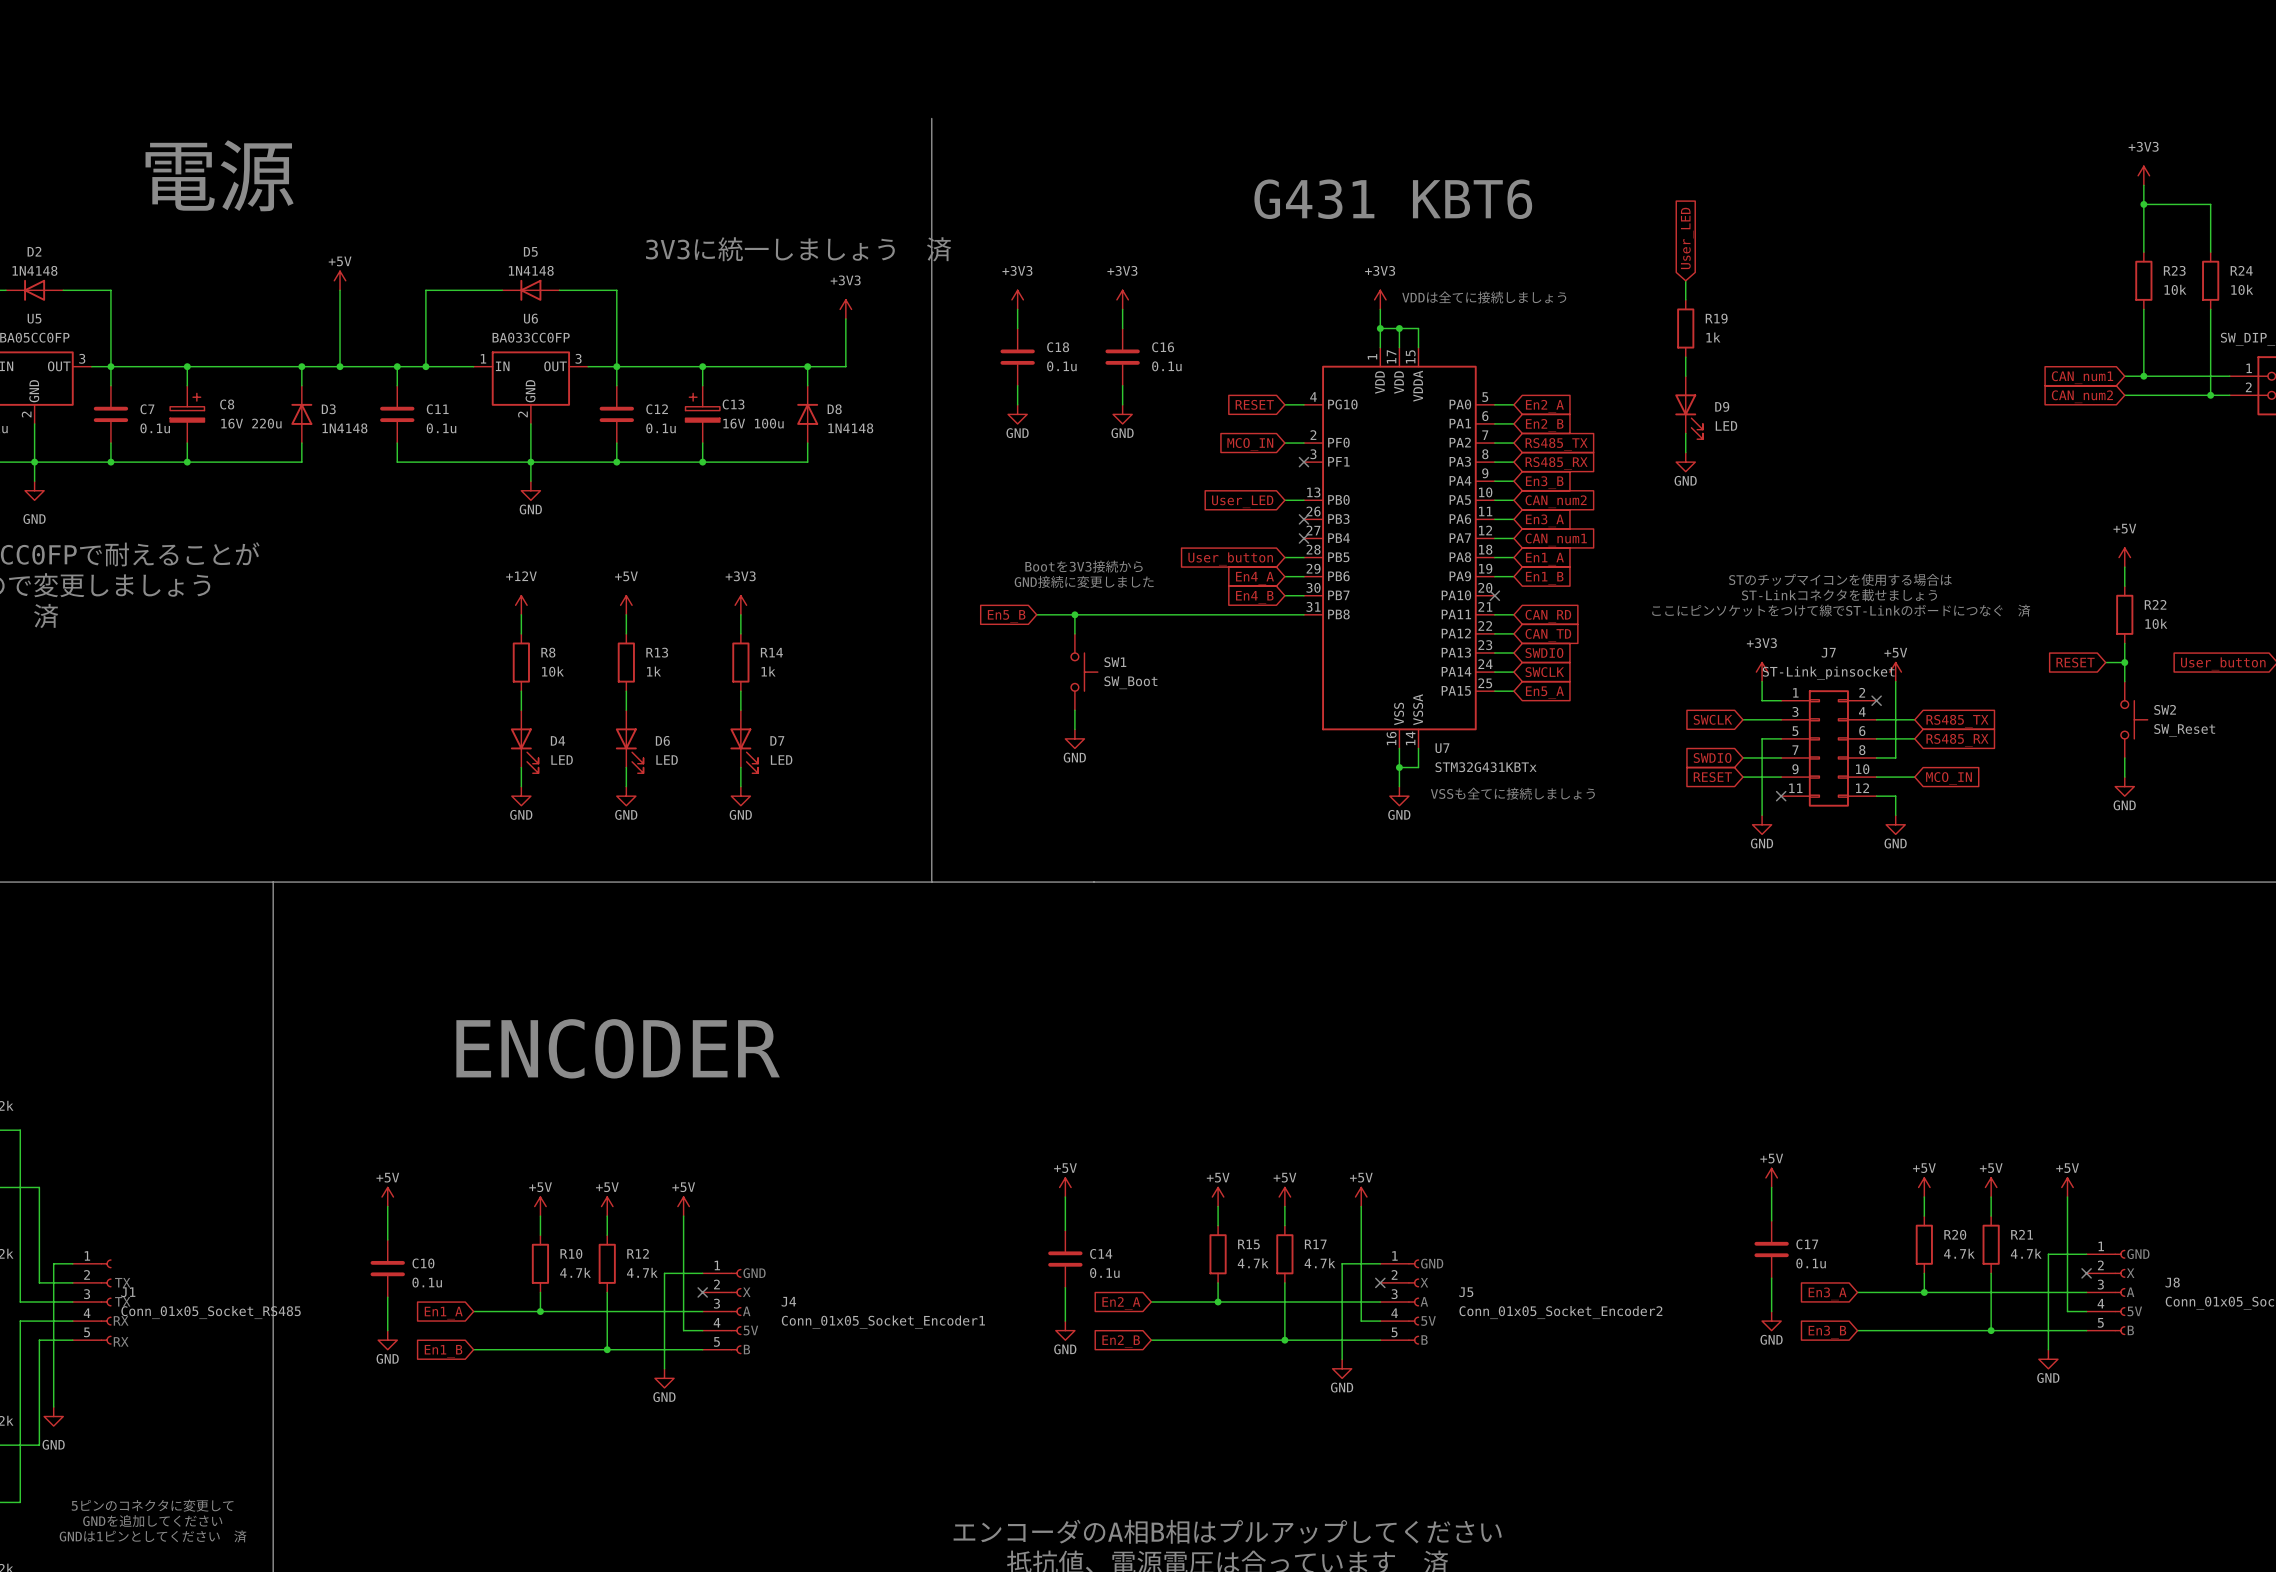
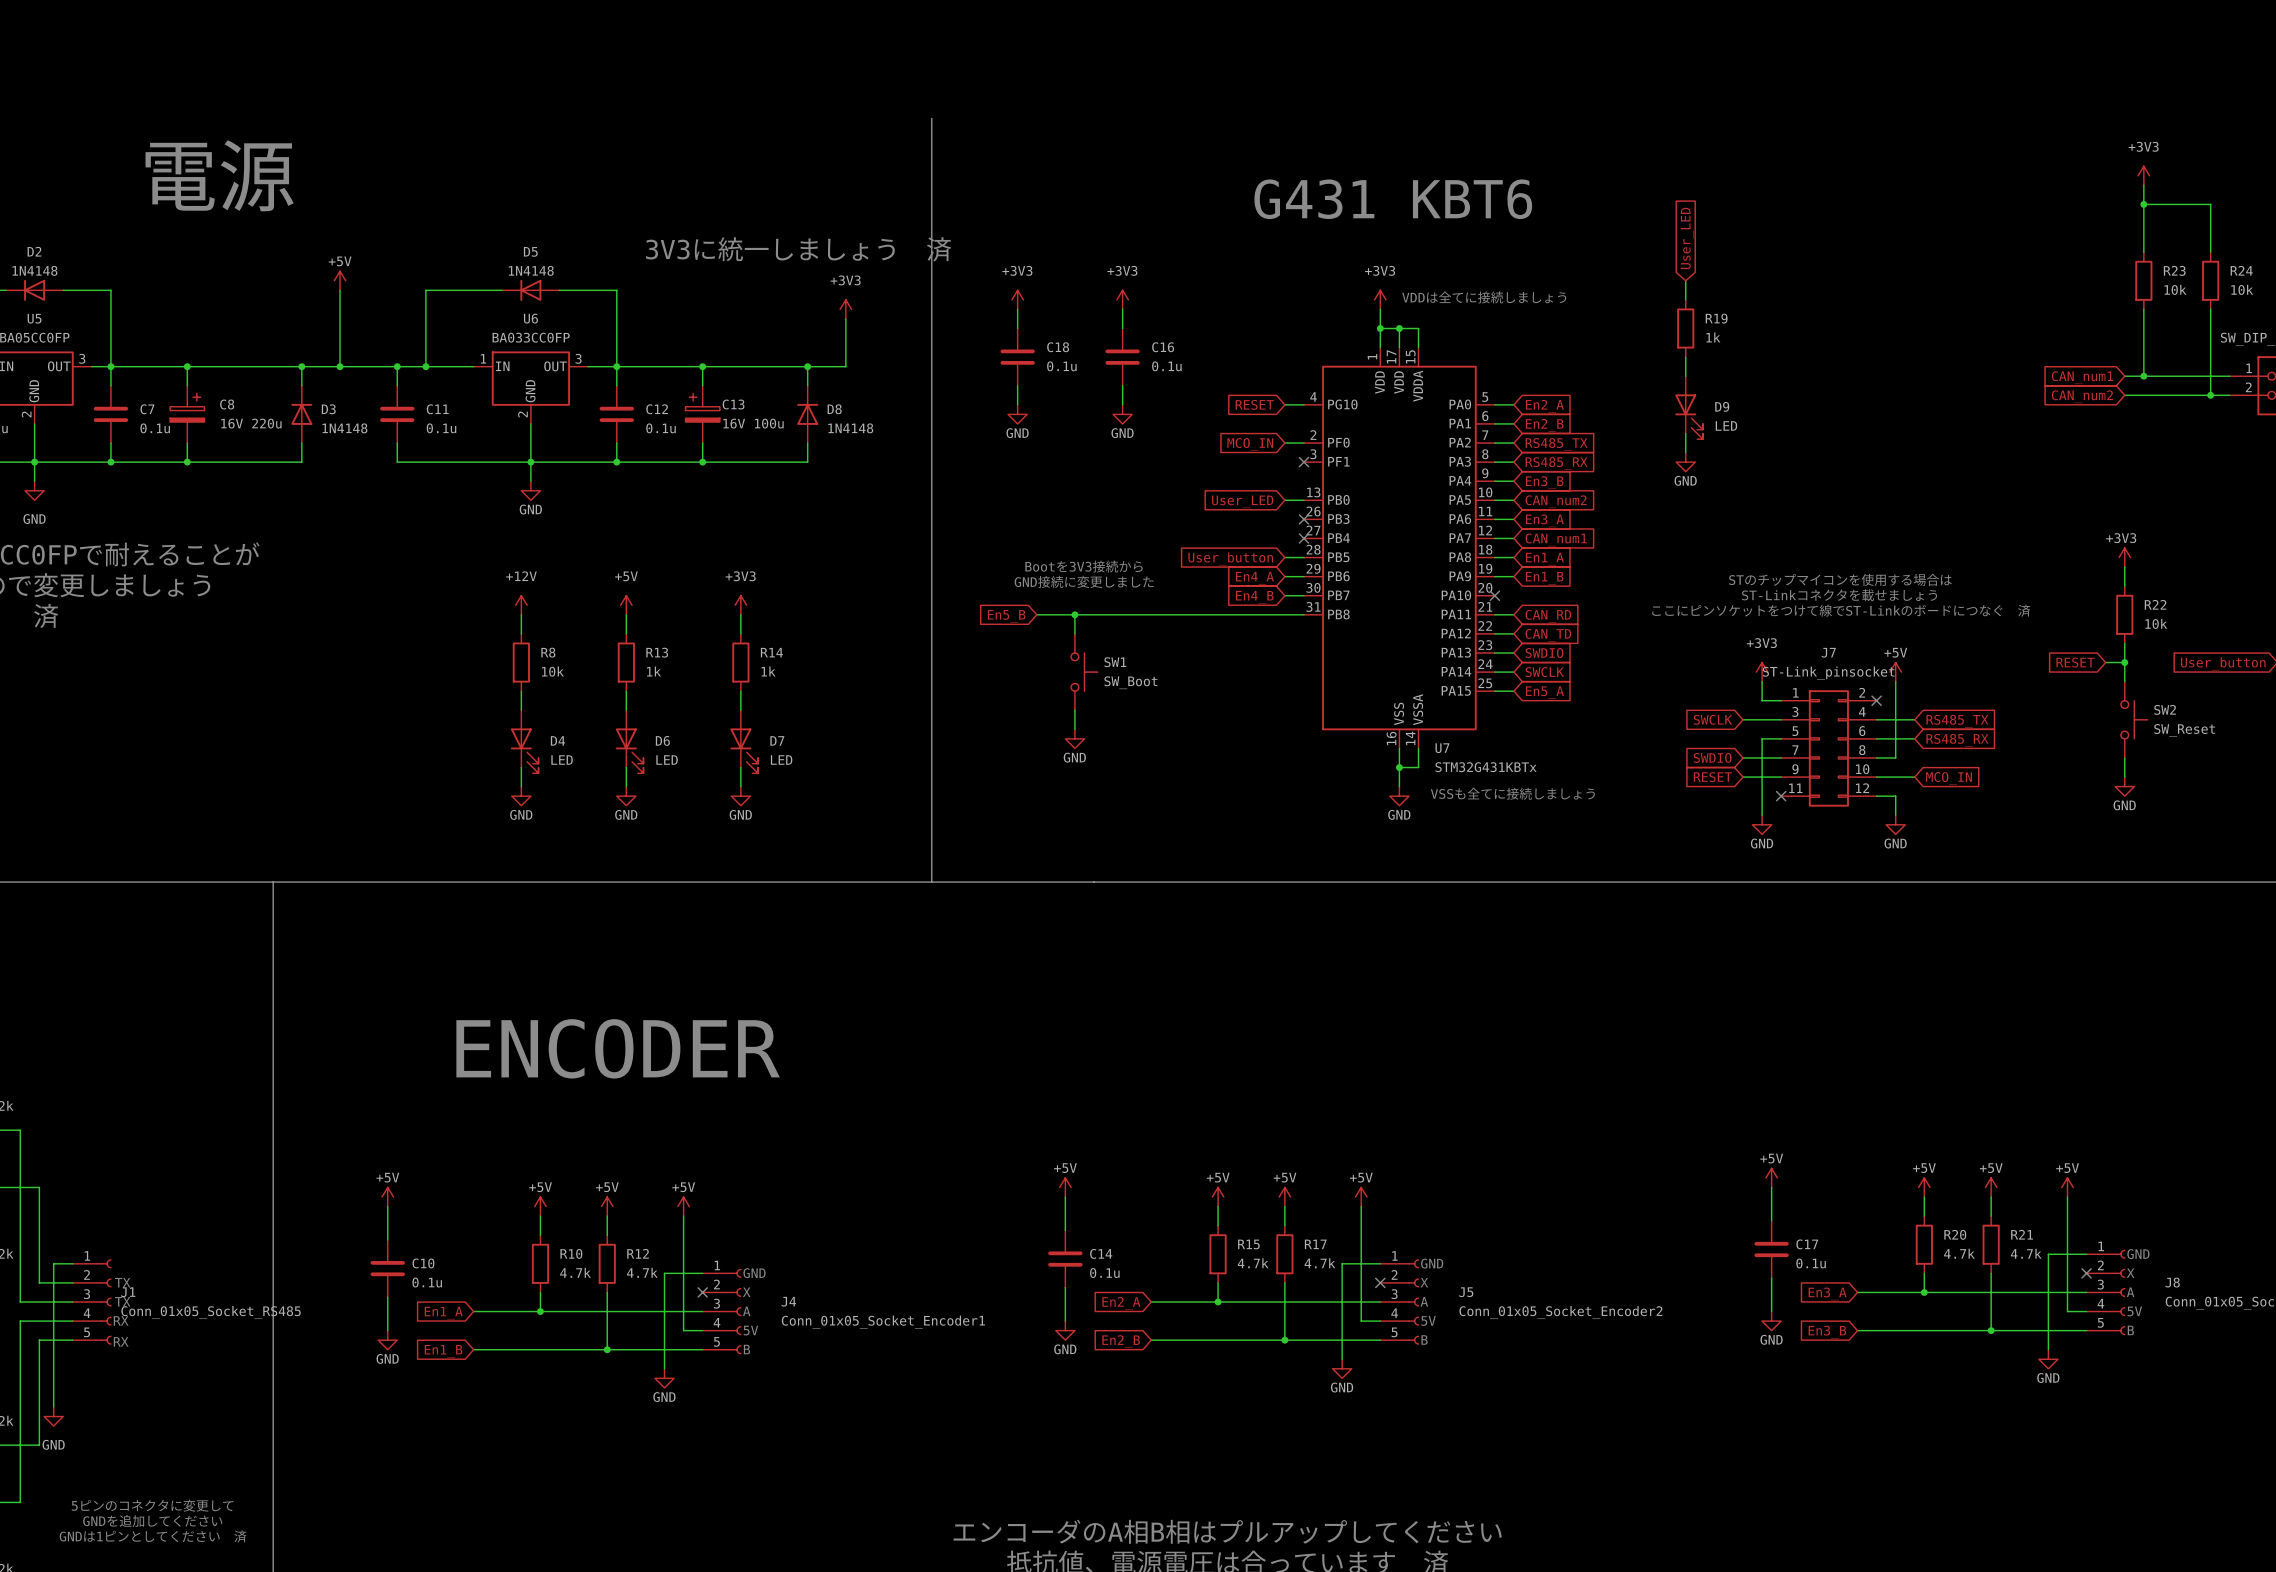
power symbol: +5V (2124, 557) -> +3V3 (2124, 557)

